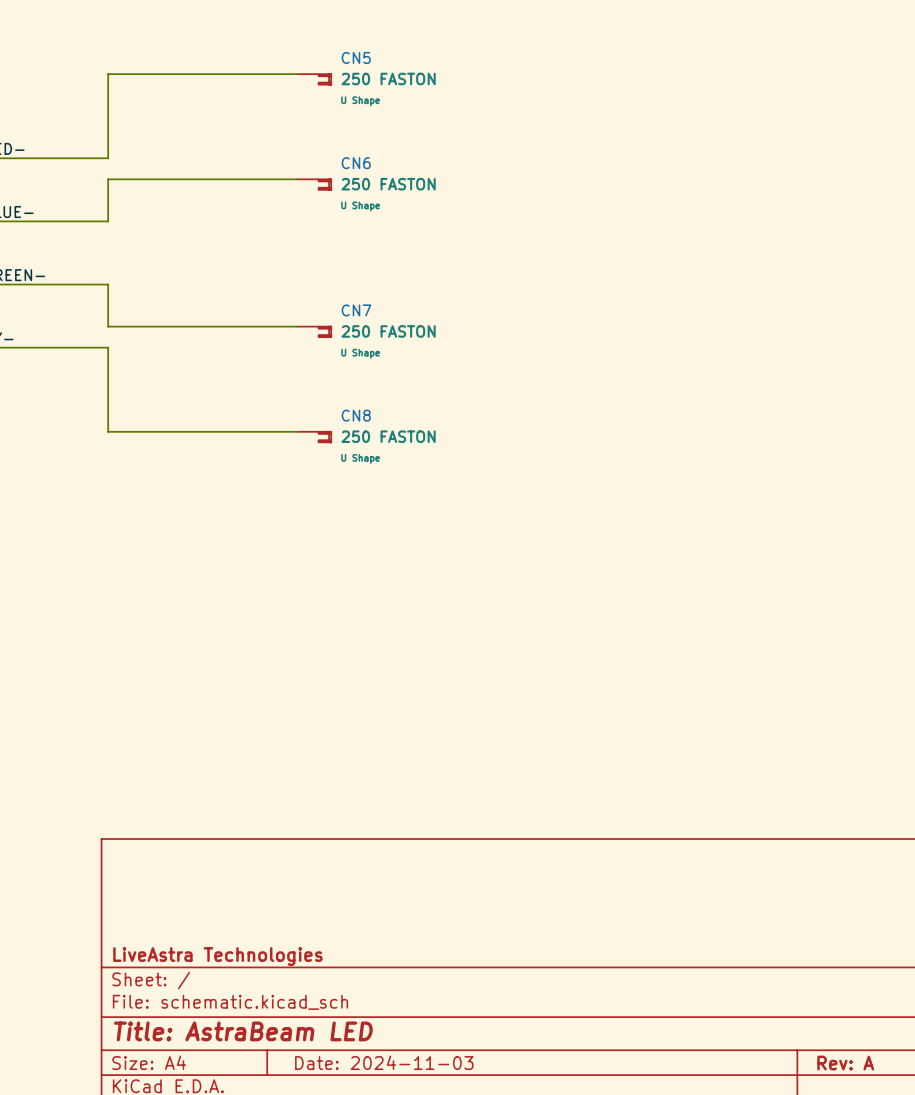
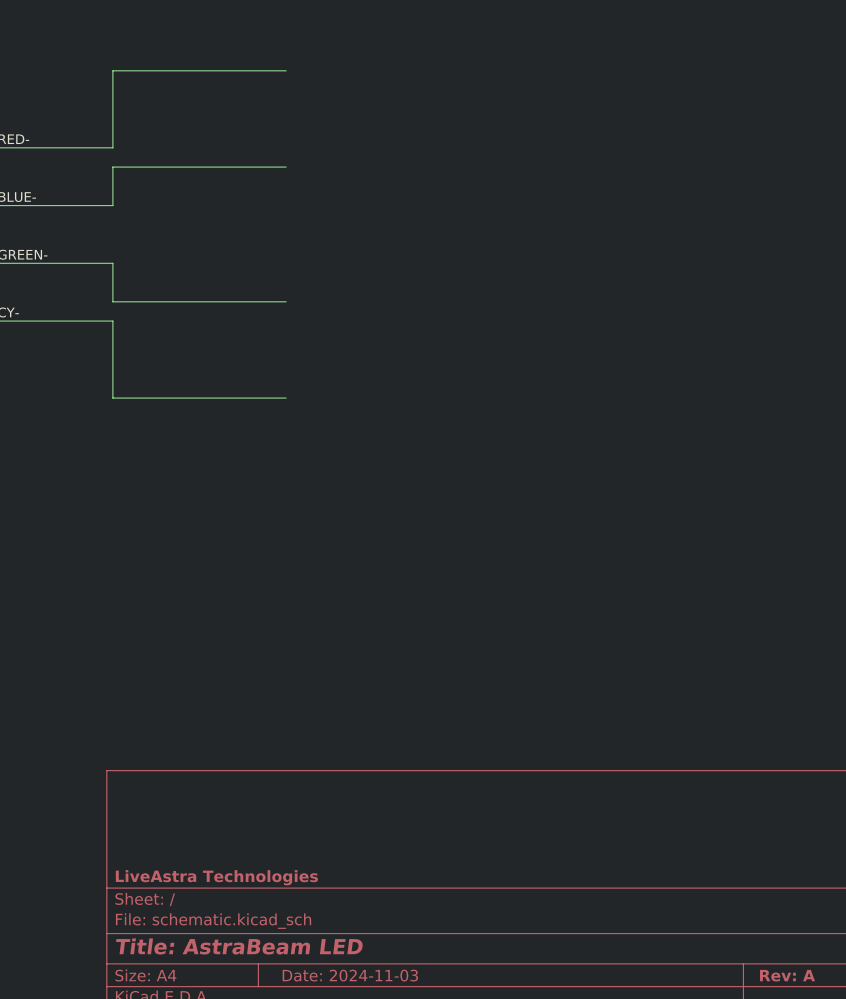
CN5: 250 FASTON (314, 79) -> none
CN6: 250 FASTON (314, 184) -> none
CN7: 250 FASTON (314, 331) -> none
CN8: 250 FASTON (314, 437) -> none

